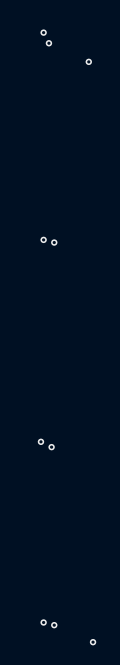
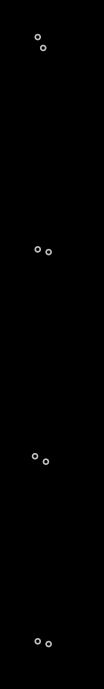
via: (88, 61) -> none
via: (93, 642) -> none

